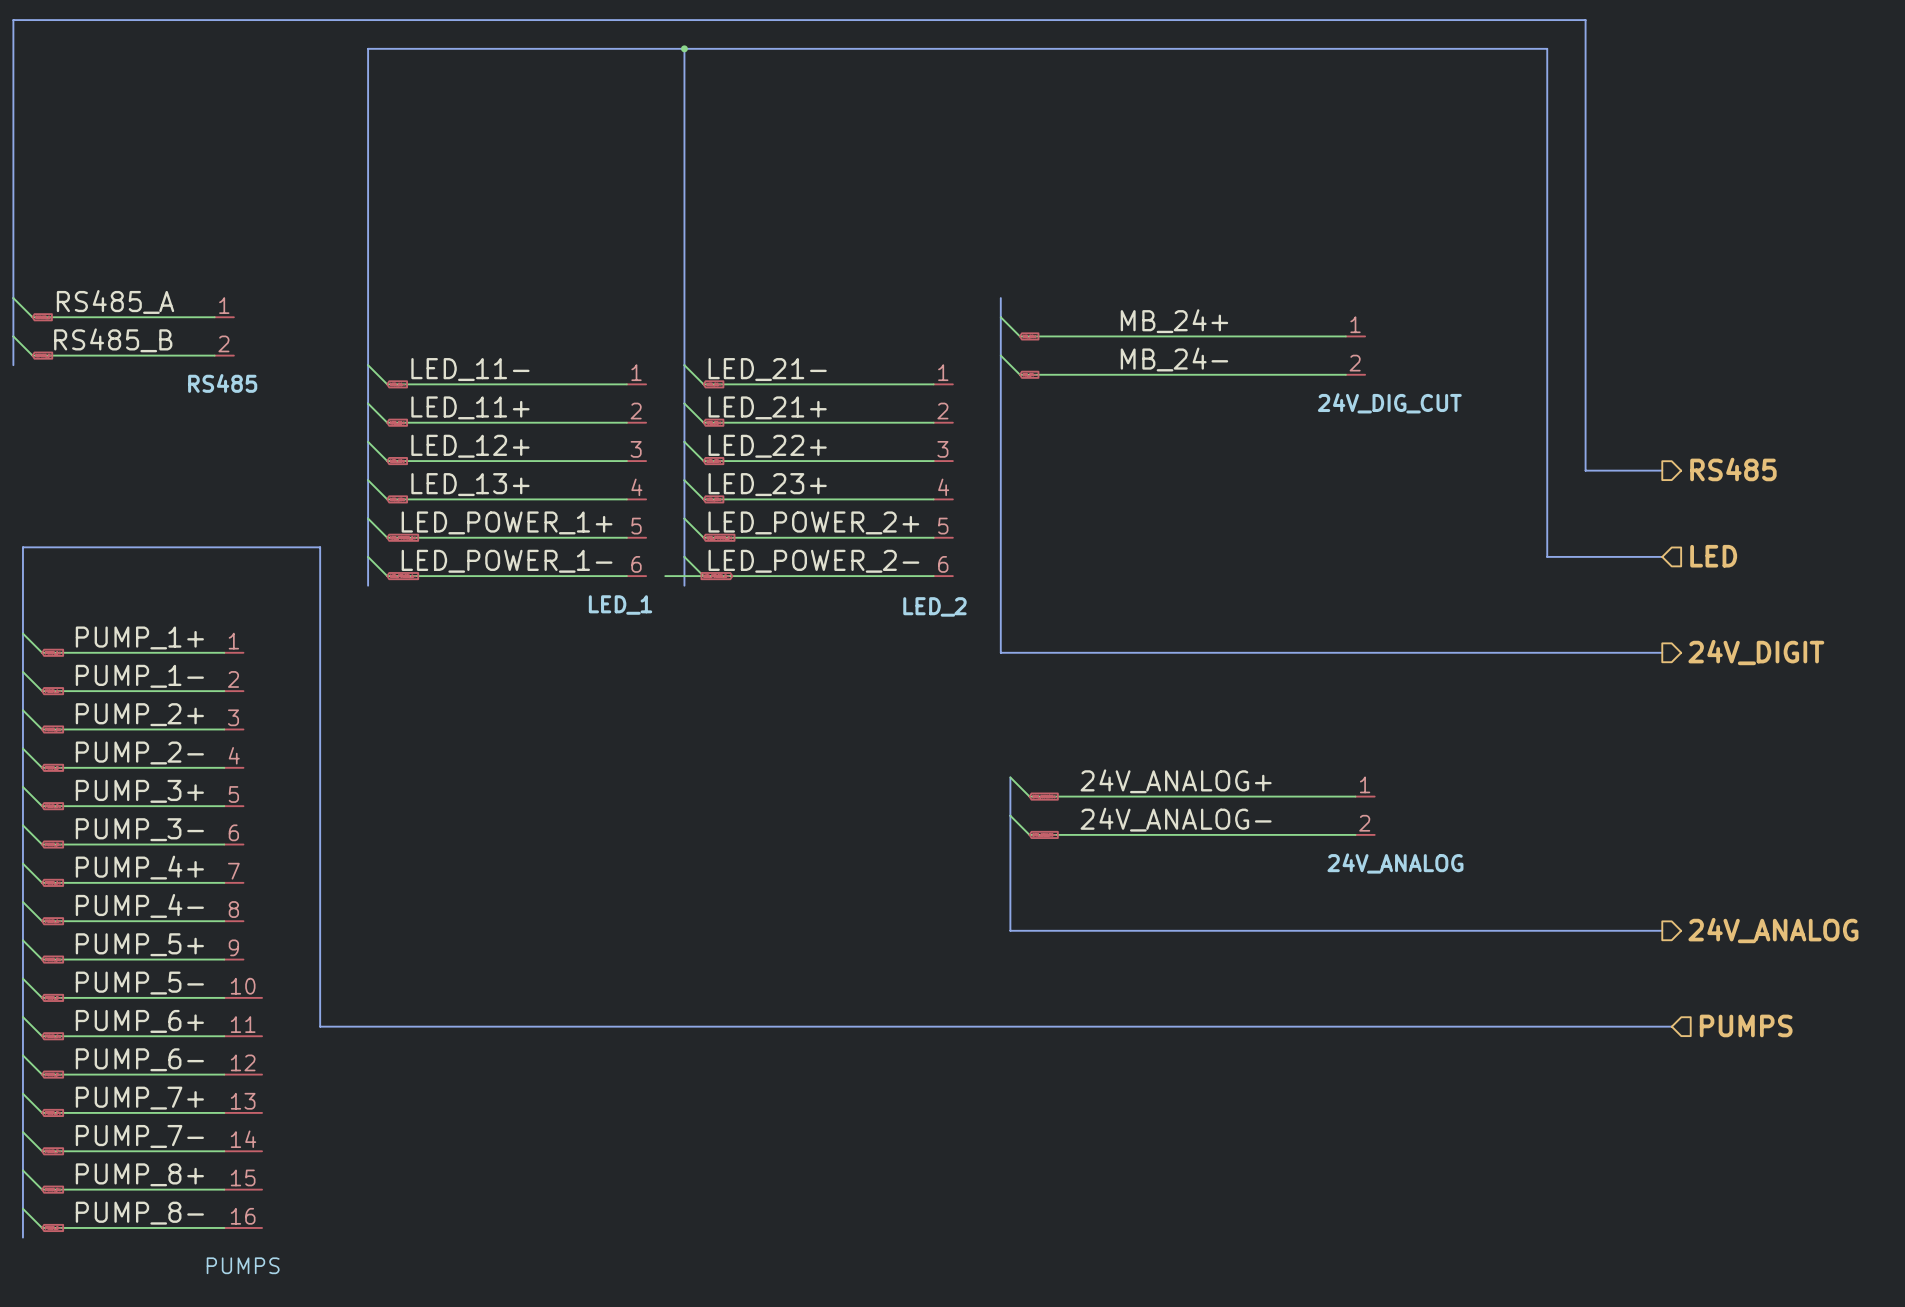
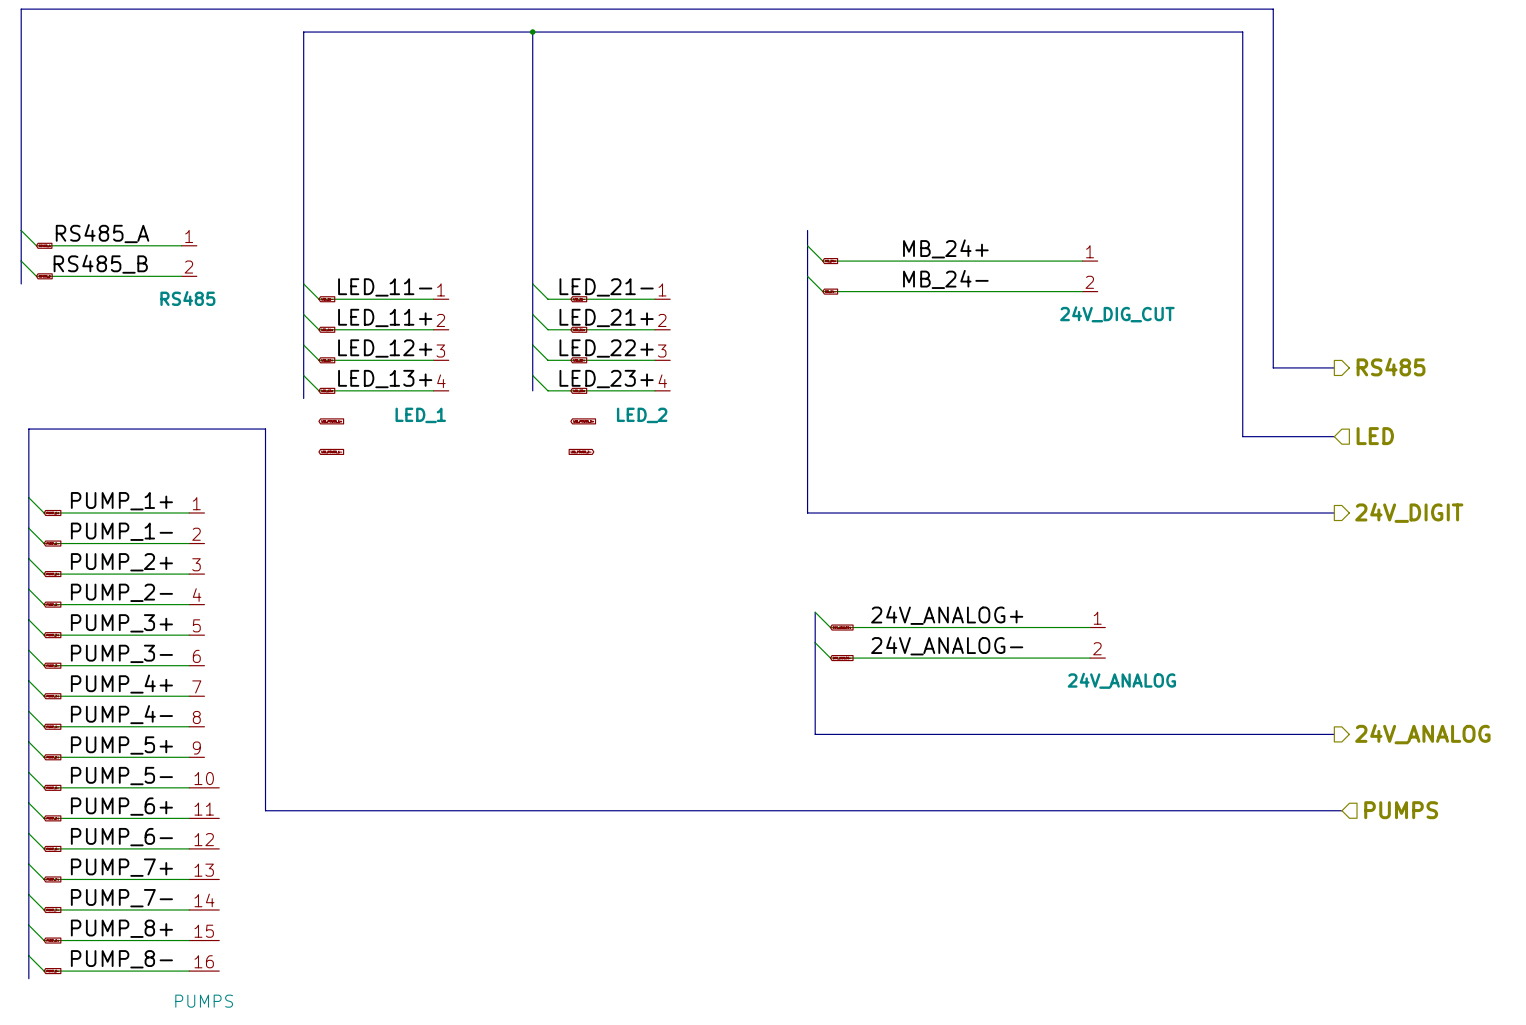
bus: none -> (532, 32) (532, 390)
bus: (684, 48) (684, 585) -> none
junction position: (684, 48) -> (532, 32)
wire: (684, 365) (703, 384) -> (532, 283) (547, 299) (570, 299)
label position: LED_21- (767, 369) -> LED_21- (606, 287)
wire: (531, 384) (626, 384) -> none
LED_1 symbol: [626, 384, 647, 577] -> [433, 299, 449, 391]
wire: (809, 384) (933, 384) -> none
LED_2 symbol: [933, 384, 953, 577] -> [654, 299, 671, 391]
wire: (684, 403) (703, 422) -> (532, 314) (547, 329) (570, 329)
label position: LED_21+ (767, 407) -> LED_21+ (606, 317)
wire: (531, 422) (626, 422) -> none
wire: (809, 422) (933, 422) -> none
wire: (684, 441) (703, 461) -> (532, 345) (547, 360) (570, 360)
label position: LED_22+ (767, 446) -> LED_22+ (606, 348)
wire: (531, 461) (626, 461) -> none
wire: (809, 461) (933, 461) -> none
wire: (684, 480) (703, 499) -> (532, 375) (547, 390) (570, 390)
label position: LED_23+ (767, 484) -> LED_23+ (606, 379)
wire: (531, 499) (626, 499) -> none
wire: (809, 499) (933, 499) -> none
bus: (368, 508) (368, 585) -> none
wire: (368, 518) (387, 537) (626, 537) -> none
wire: (684, 518) (703, 537) (933, 537) -> none
label: LED_POWER_1+ (507, 522) -> none
label: LED_POWER_2+ (813, 522) -> none
wire: (368, 556) (387, 576) (626, 576) -> none
wire: (684, 556) (703, 576) -> none
label: LED_POWER_1- (507, 561) -> none
label: LED_POWER_2- (813, 561) -> none
wire: (665, 576) (933, 576) -> none
LED_1 name position: LED_1 (620, 605) -> LED_1 (420, 415)
LED_2 name position: LED_2 (934, 606) -> LED_2 (642, 415)

